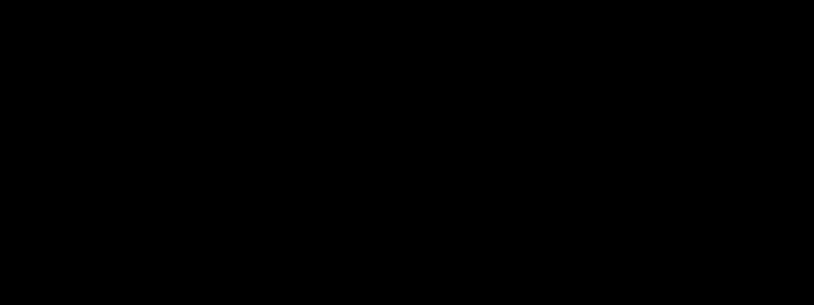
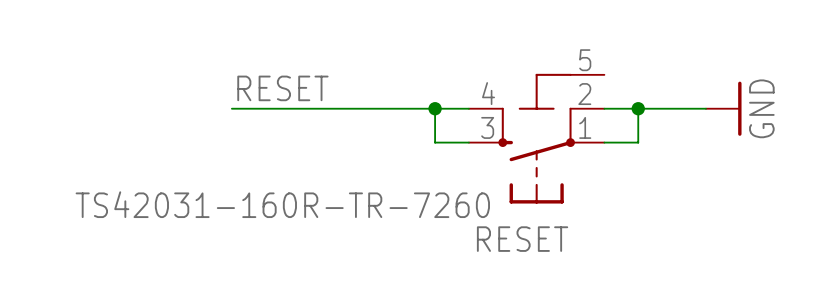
label: none -> RESET (282, 88)
wire: none -> (231, 108) (468, 108)
wire: none -> (435, 108) (435, 142) (468, 142)
junction: none -> (435, 108)
wire: none -> (604, 108) (705, 108)
wire: none -> (638, 108) (638, 142) (604, 142)
junction: none -> (638, 108)
power symbol: none -> GND (723, 108)
RESET: none -> TS42031-160R-TR-7260 (536, 138)

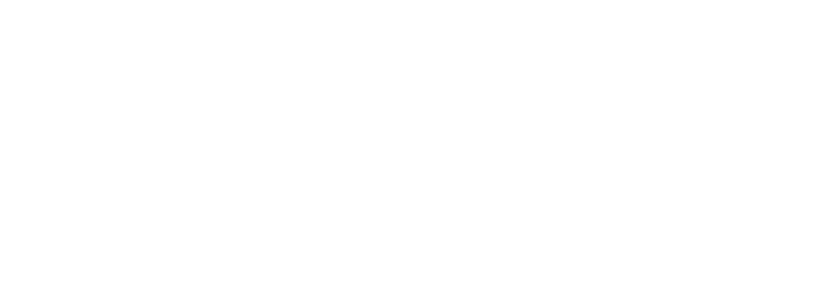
label: RESET (282, 88) -> none
wire: (231, 108) (468, 108) -> none
wire: (435, 108) (435, 142) (468, 142) -> none
junction: (435, 108) -> none
wire: (604, 108) (705, 108) -> none
wire: (638, 108) (638, 142) (604, 142) -> none
junction: (638, 108) -> none
power symbol: GND (723, 108) -> none
RESET: TS42031-160R-TR-7260 (536, 138) -> none

